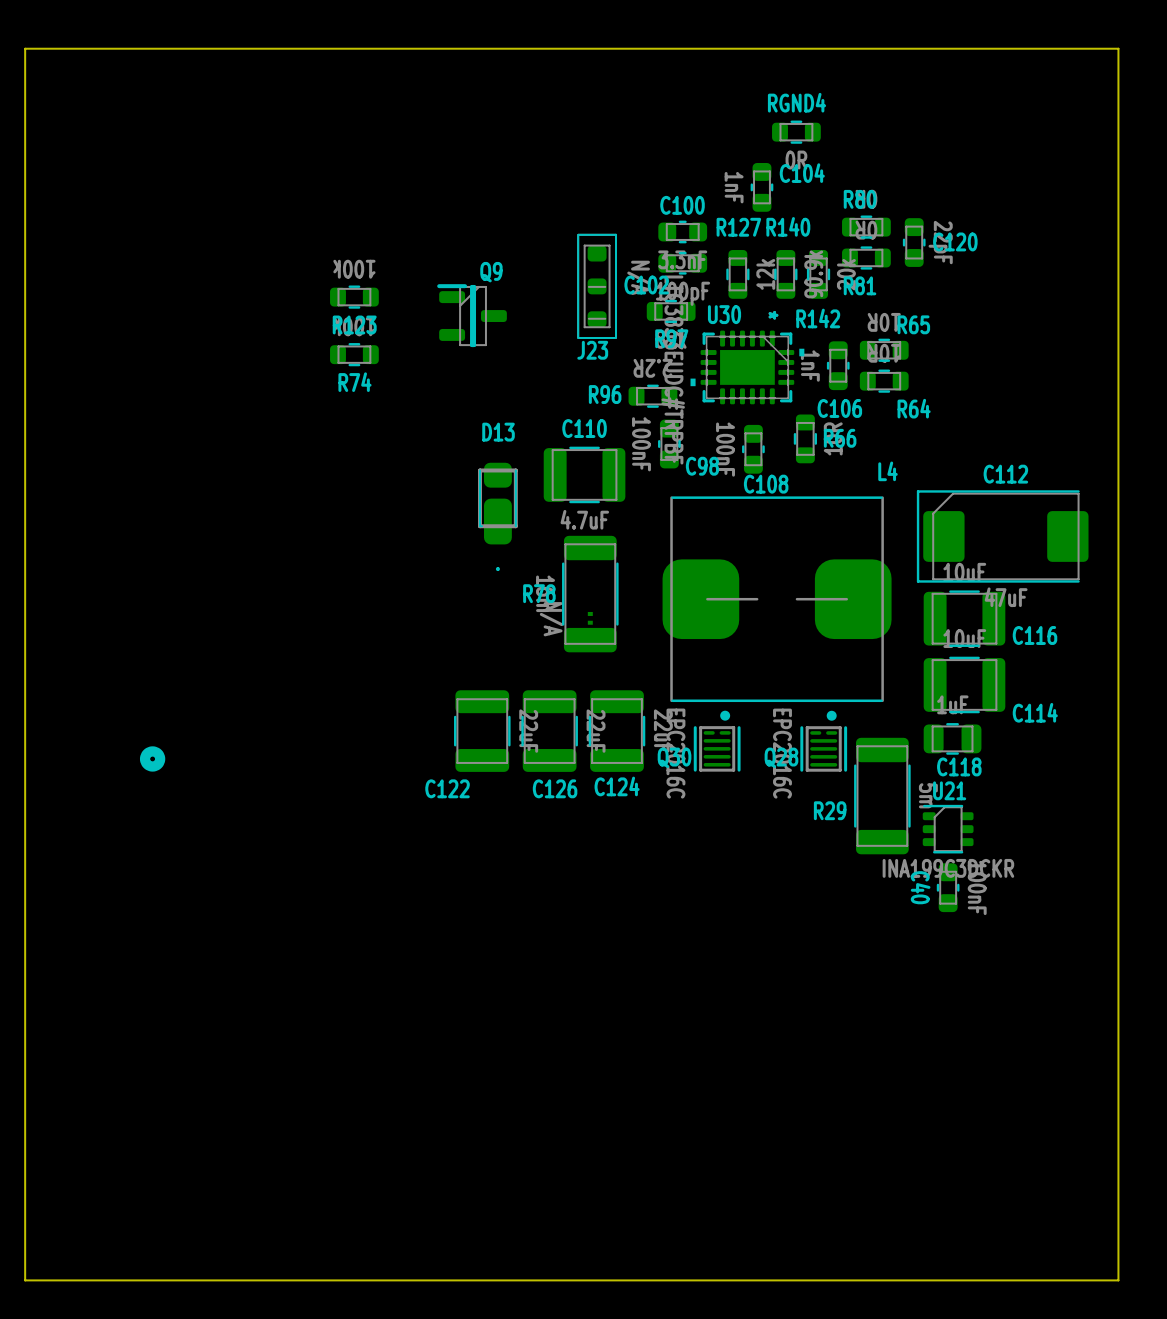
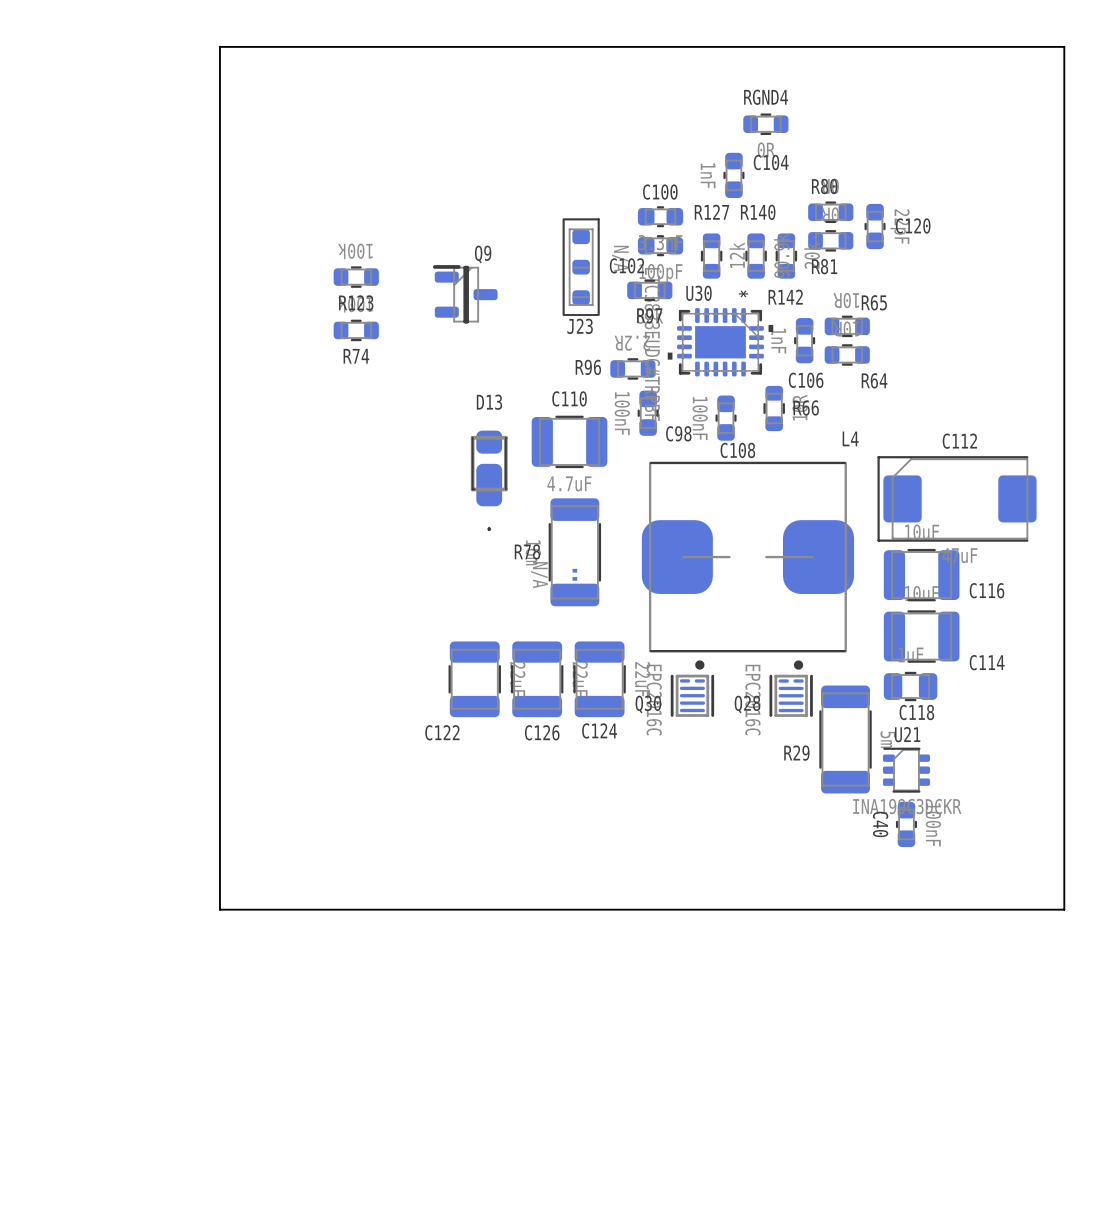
board edge: (207, 48) (25, 48) (25, 1280) (1118, 1280) (1118, 979) -> (219, 46) (219, 909) (1064, 909)
part: (152, 758) -> none

